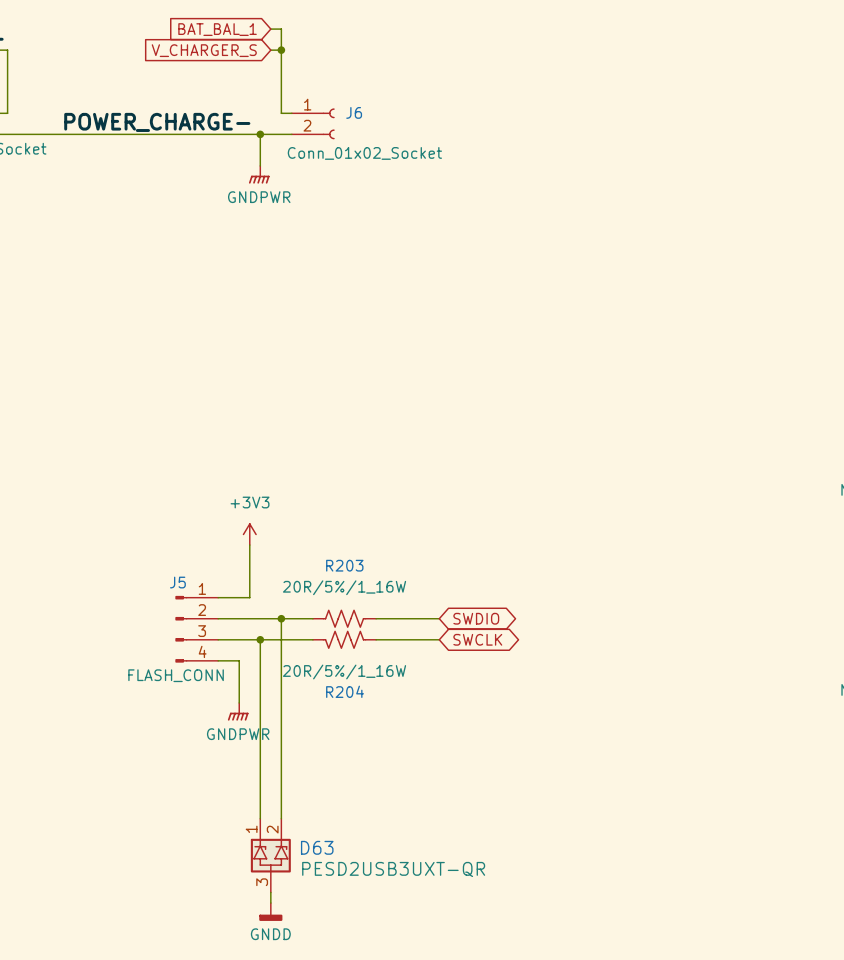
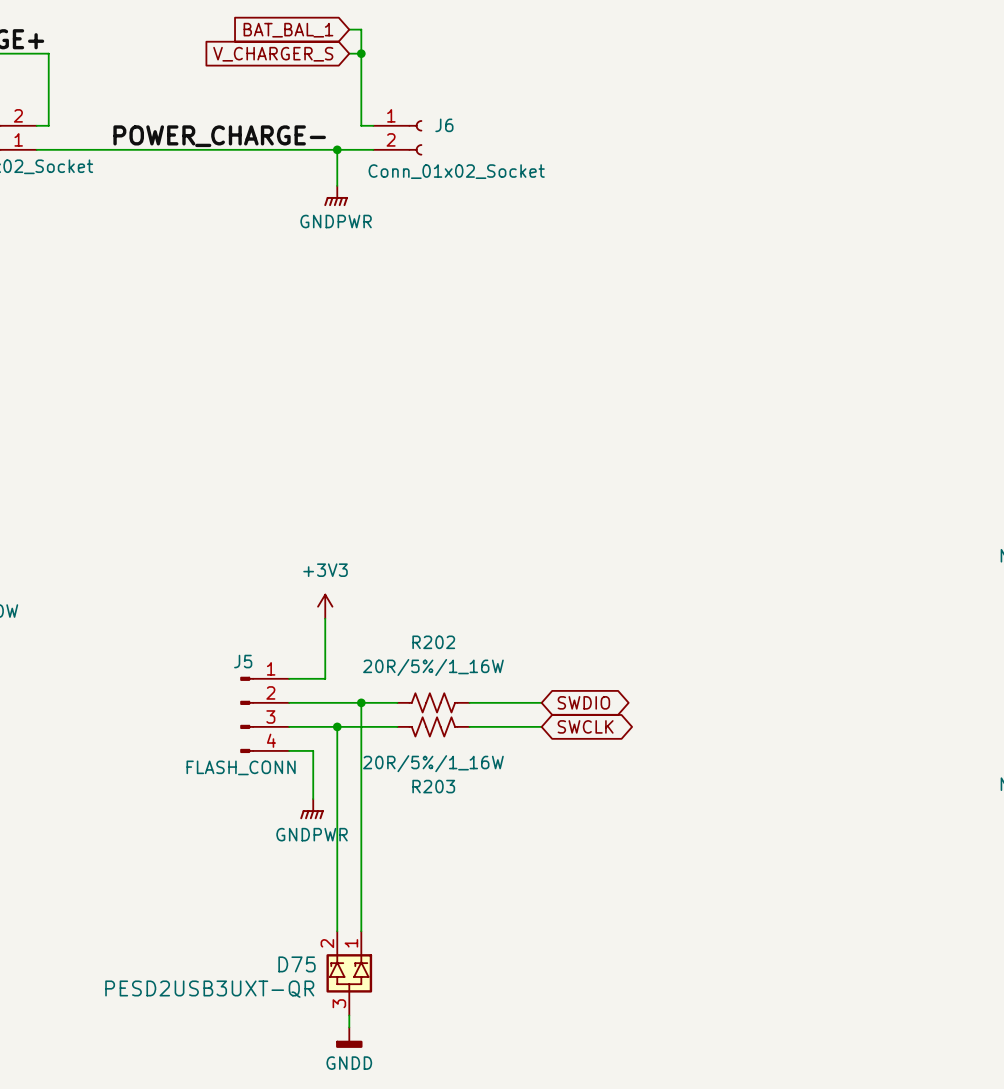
R203 name: R203 (344, 565) -> R202 (433, 642)
R204 name: R204 (345, 691) -> R203 (433, 786)
D63: PESD2USB3UXT-QR (270, 855) -> none
D75: none -> PESD2USB3UXT-QR (349, 973)

